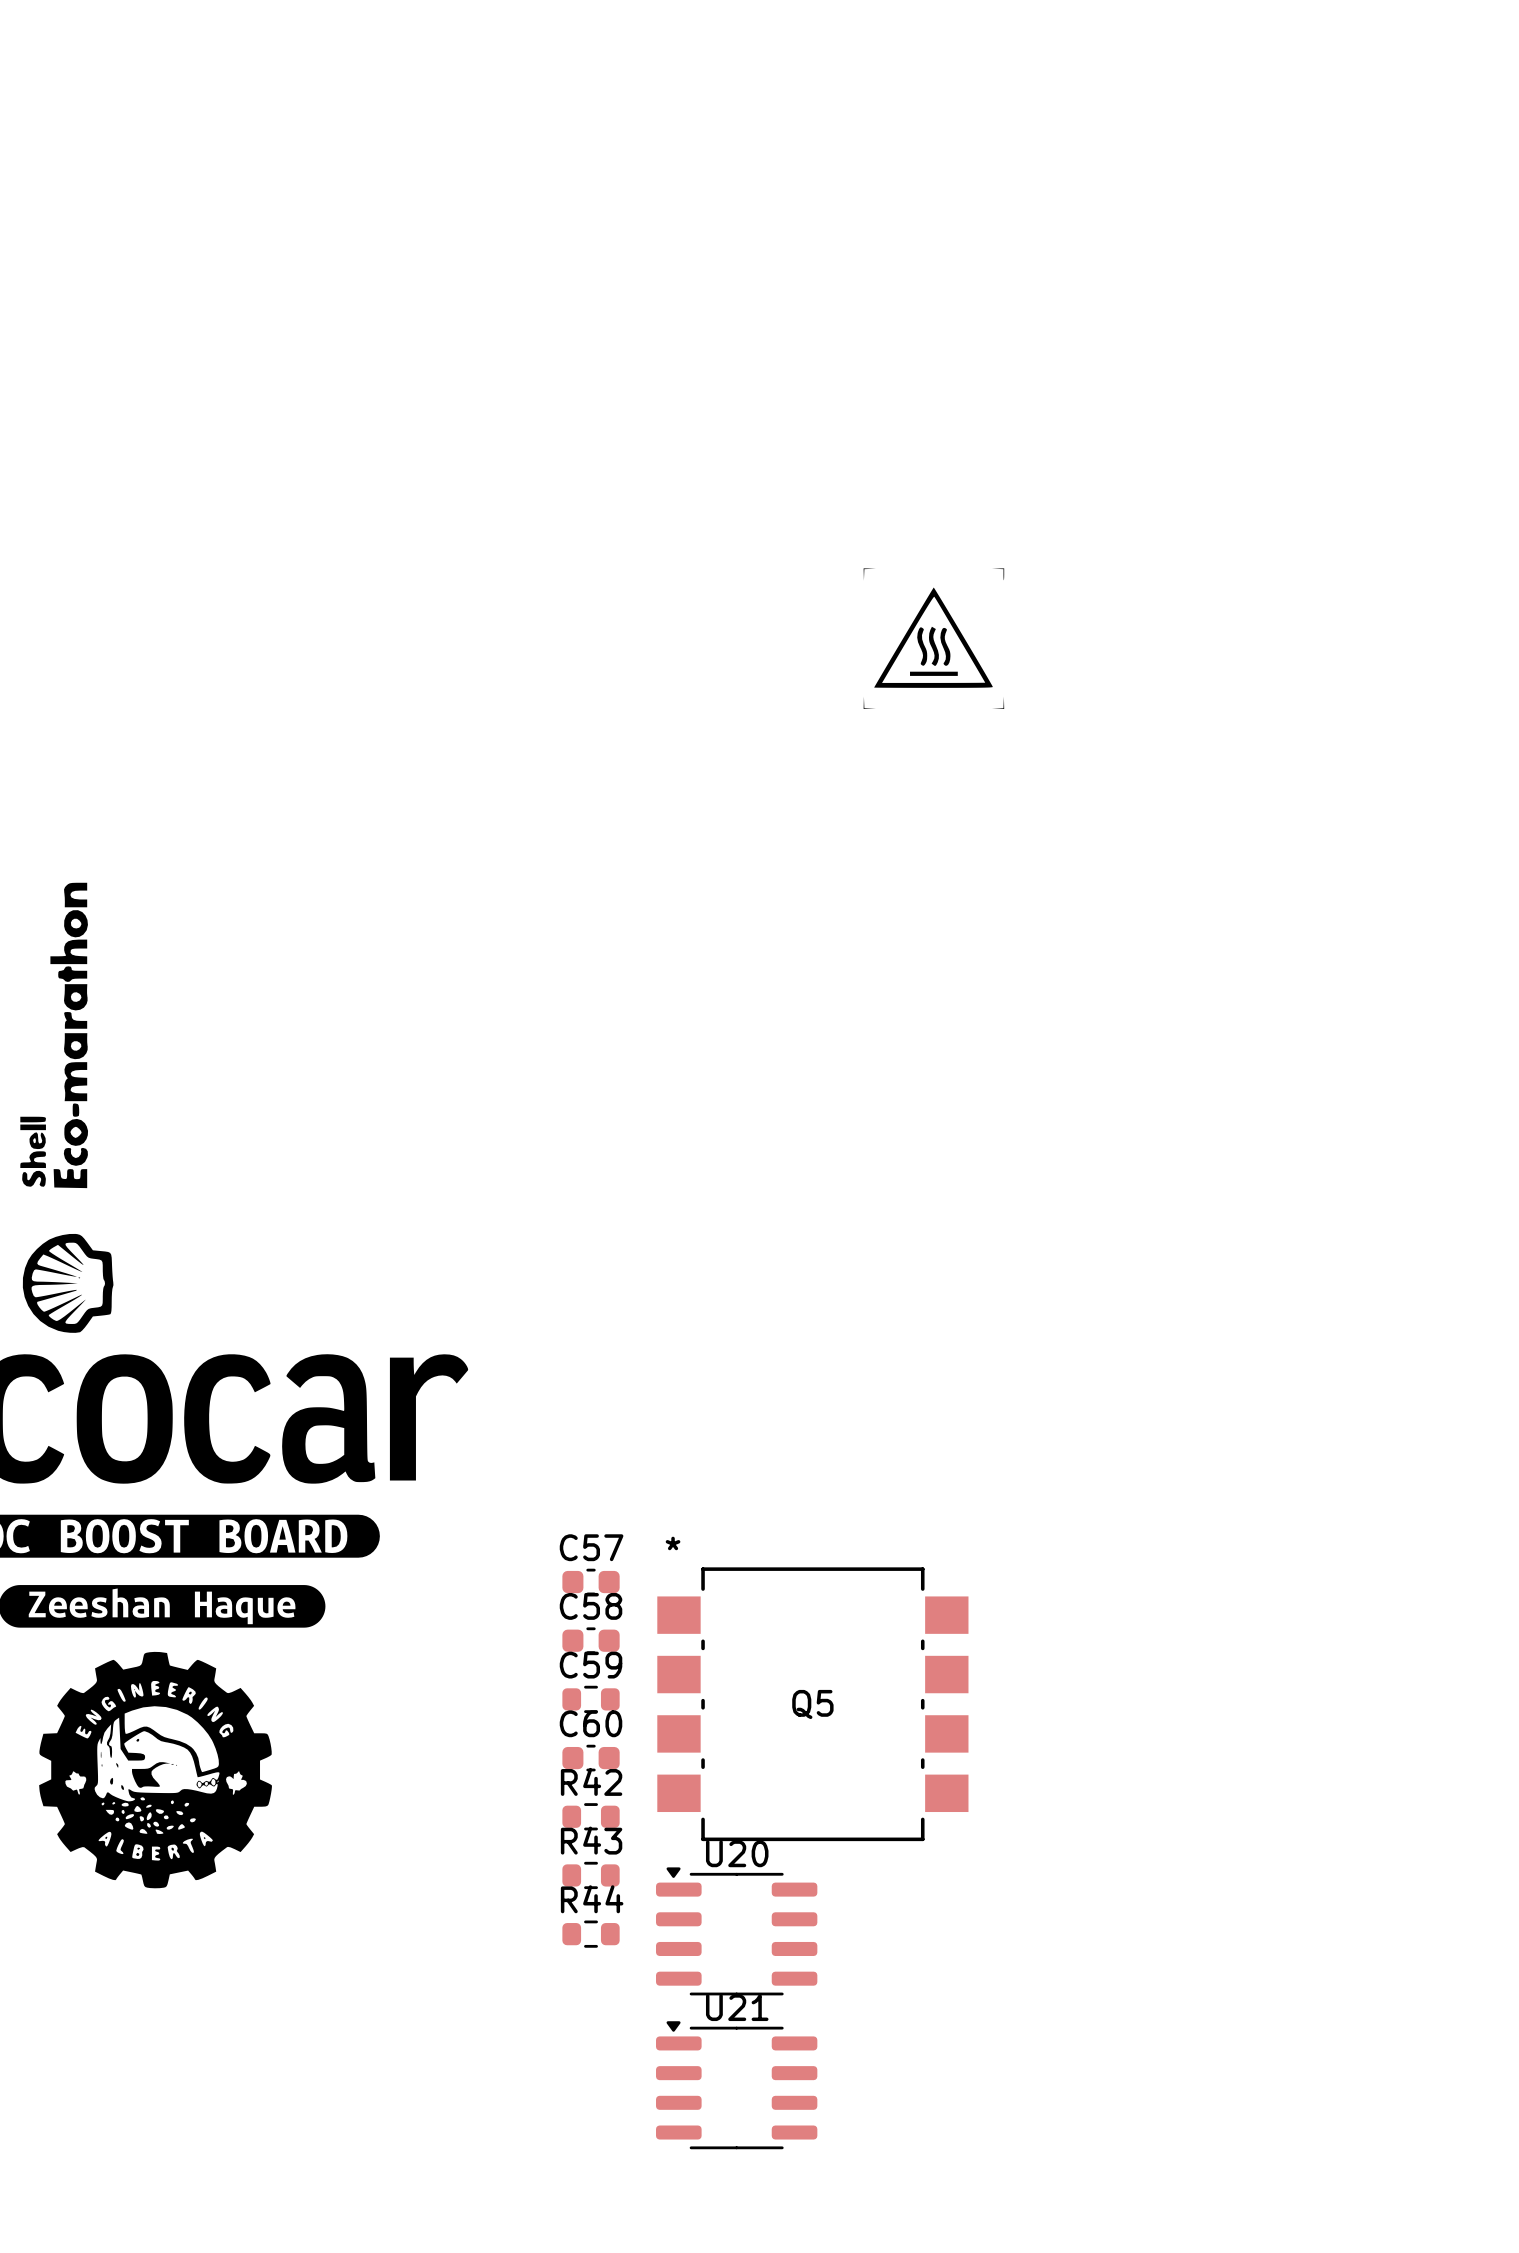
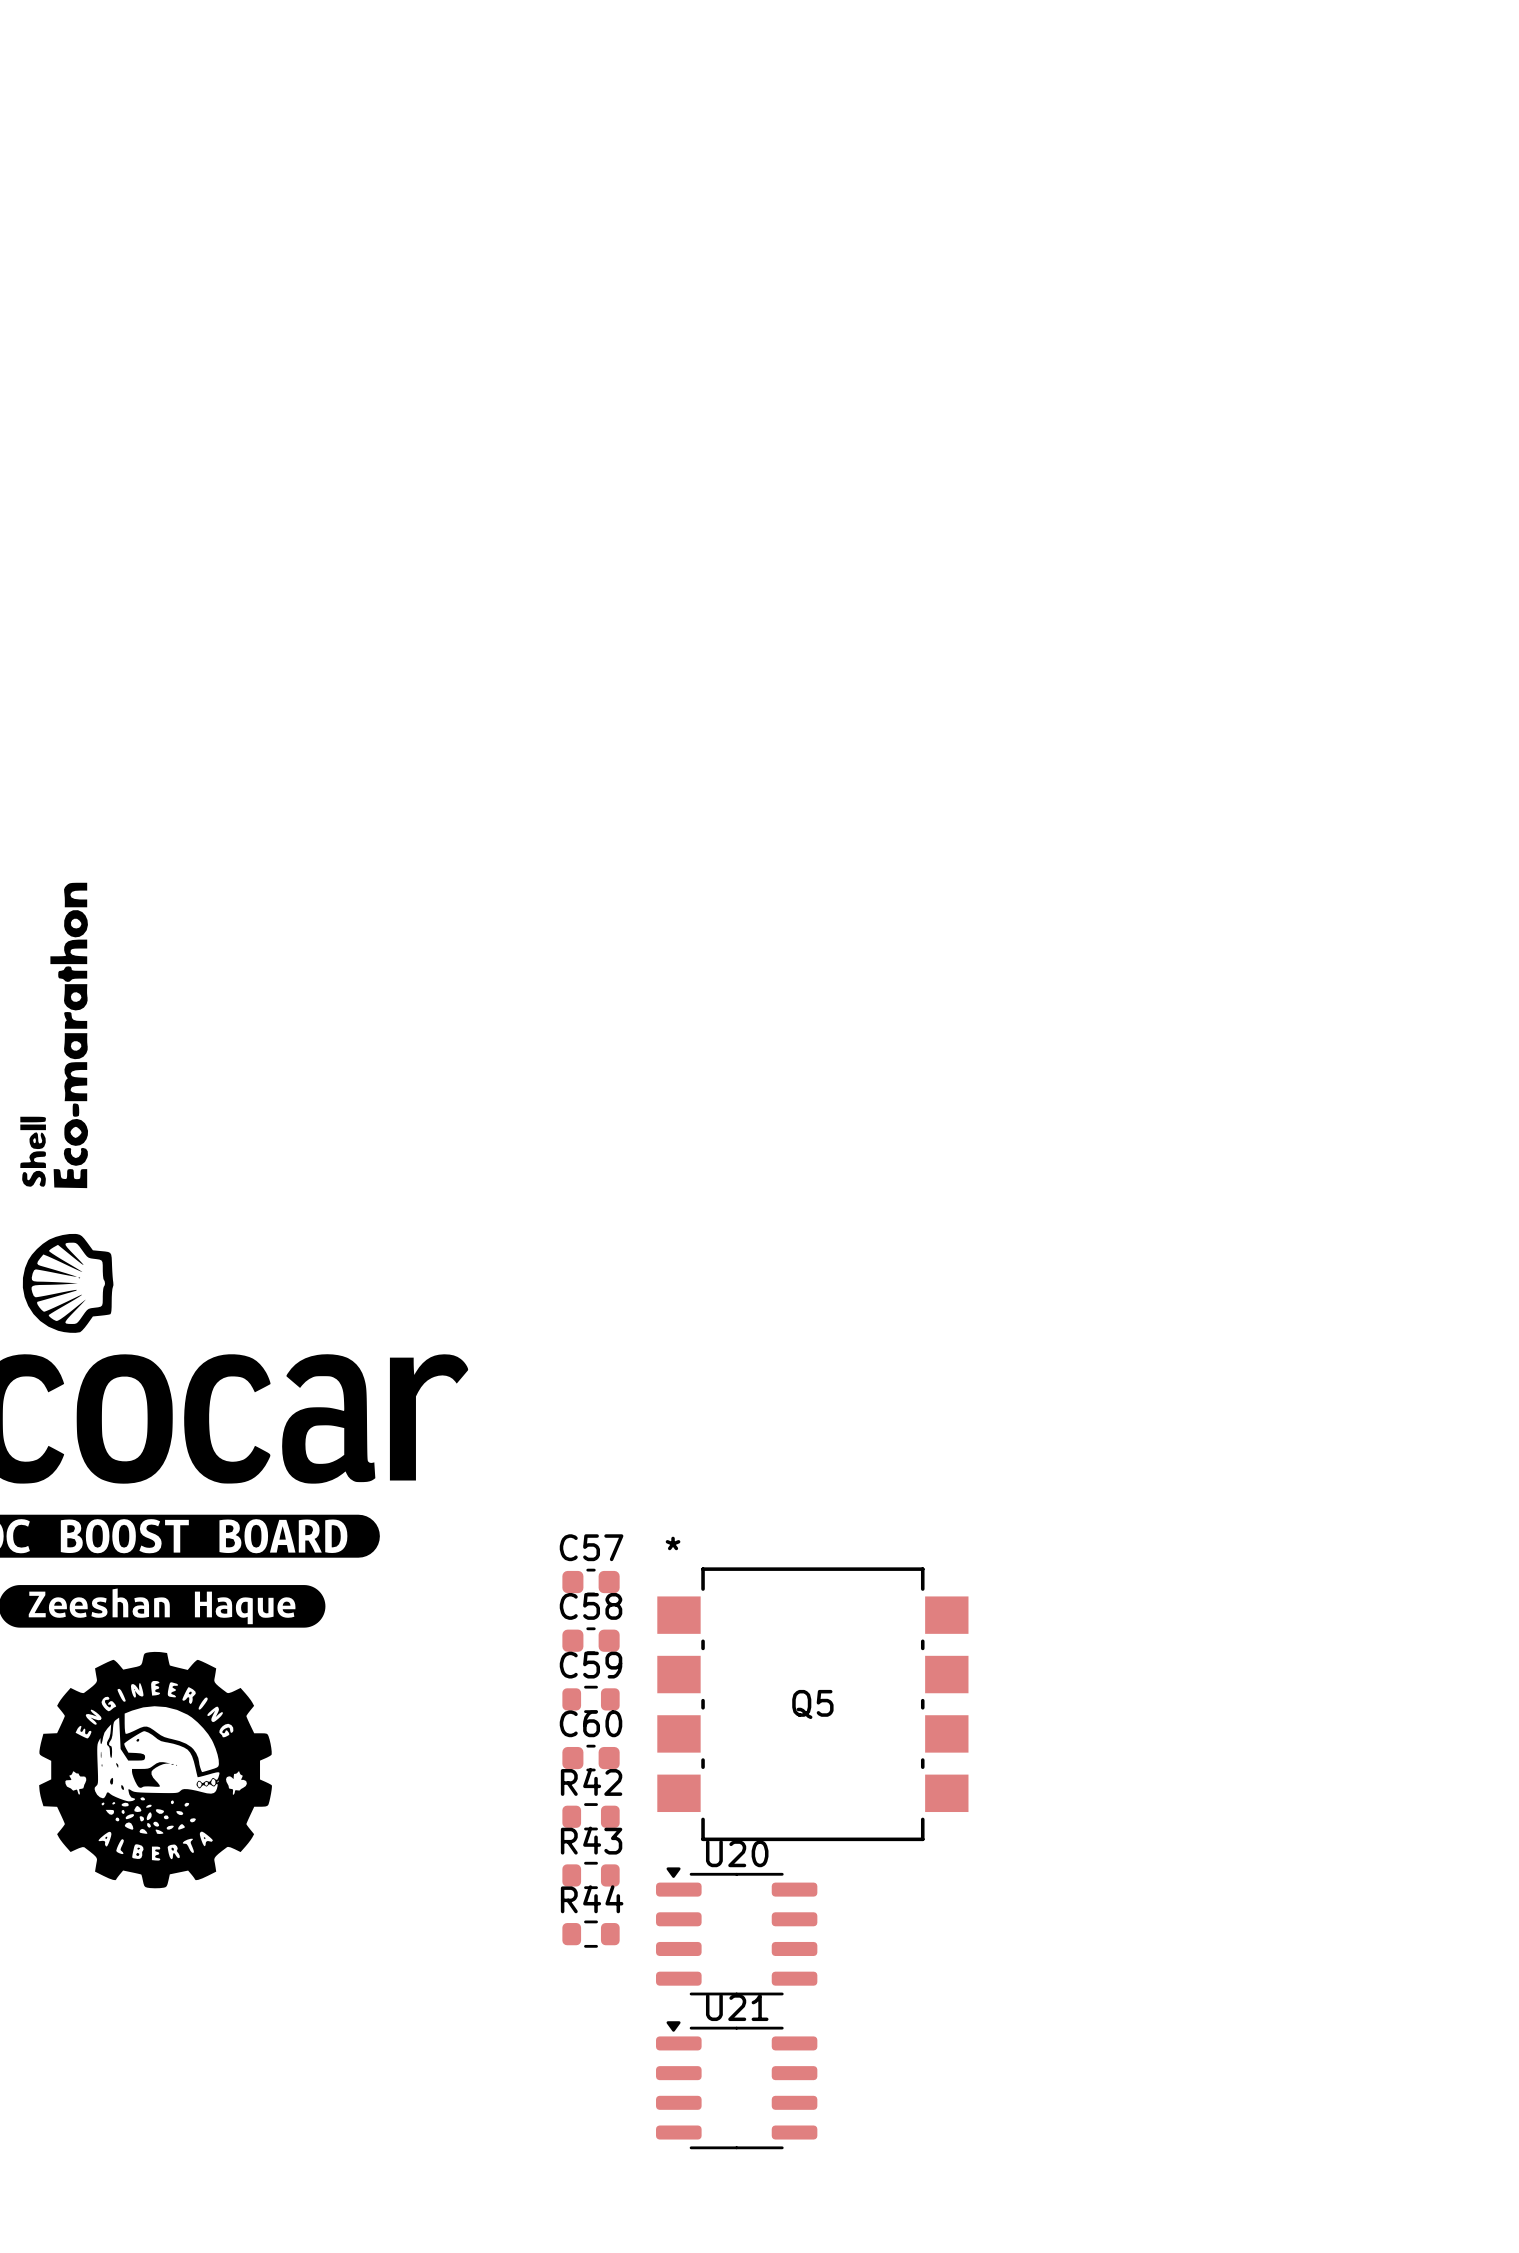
drawing: [863, 568, 1005, 709] -> none

